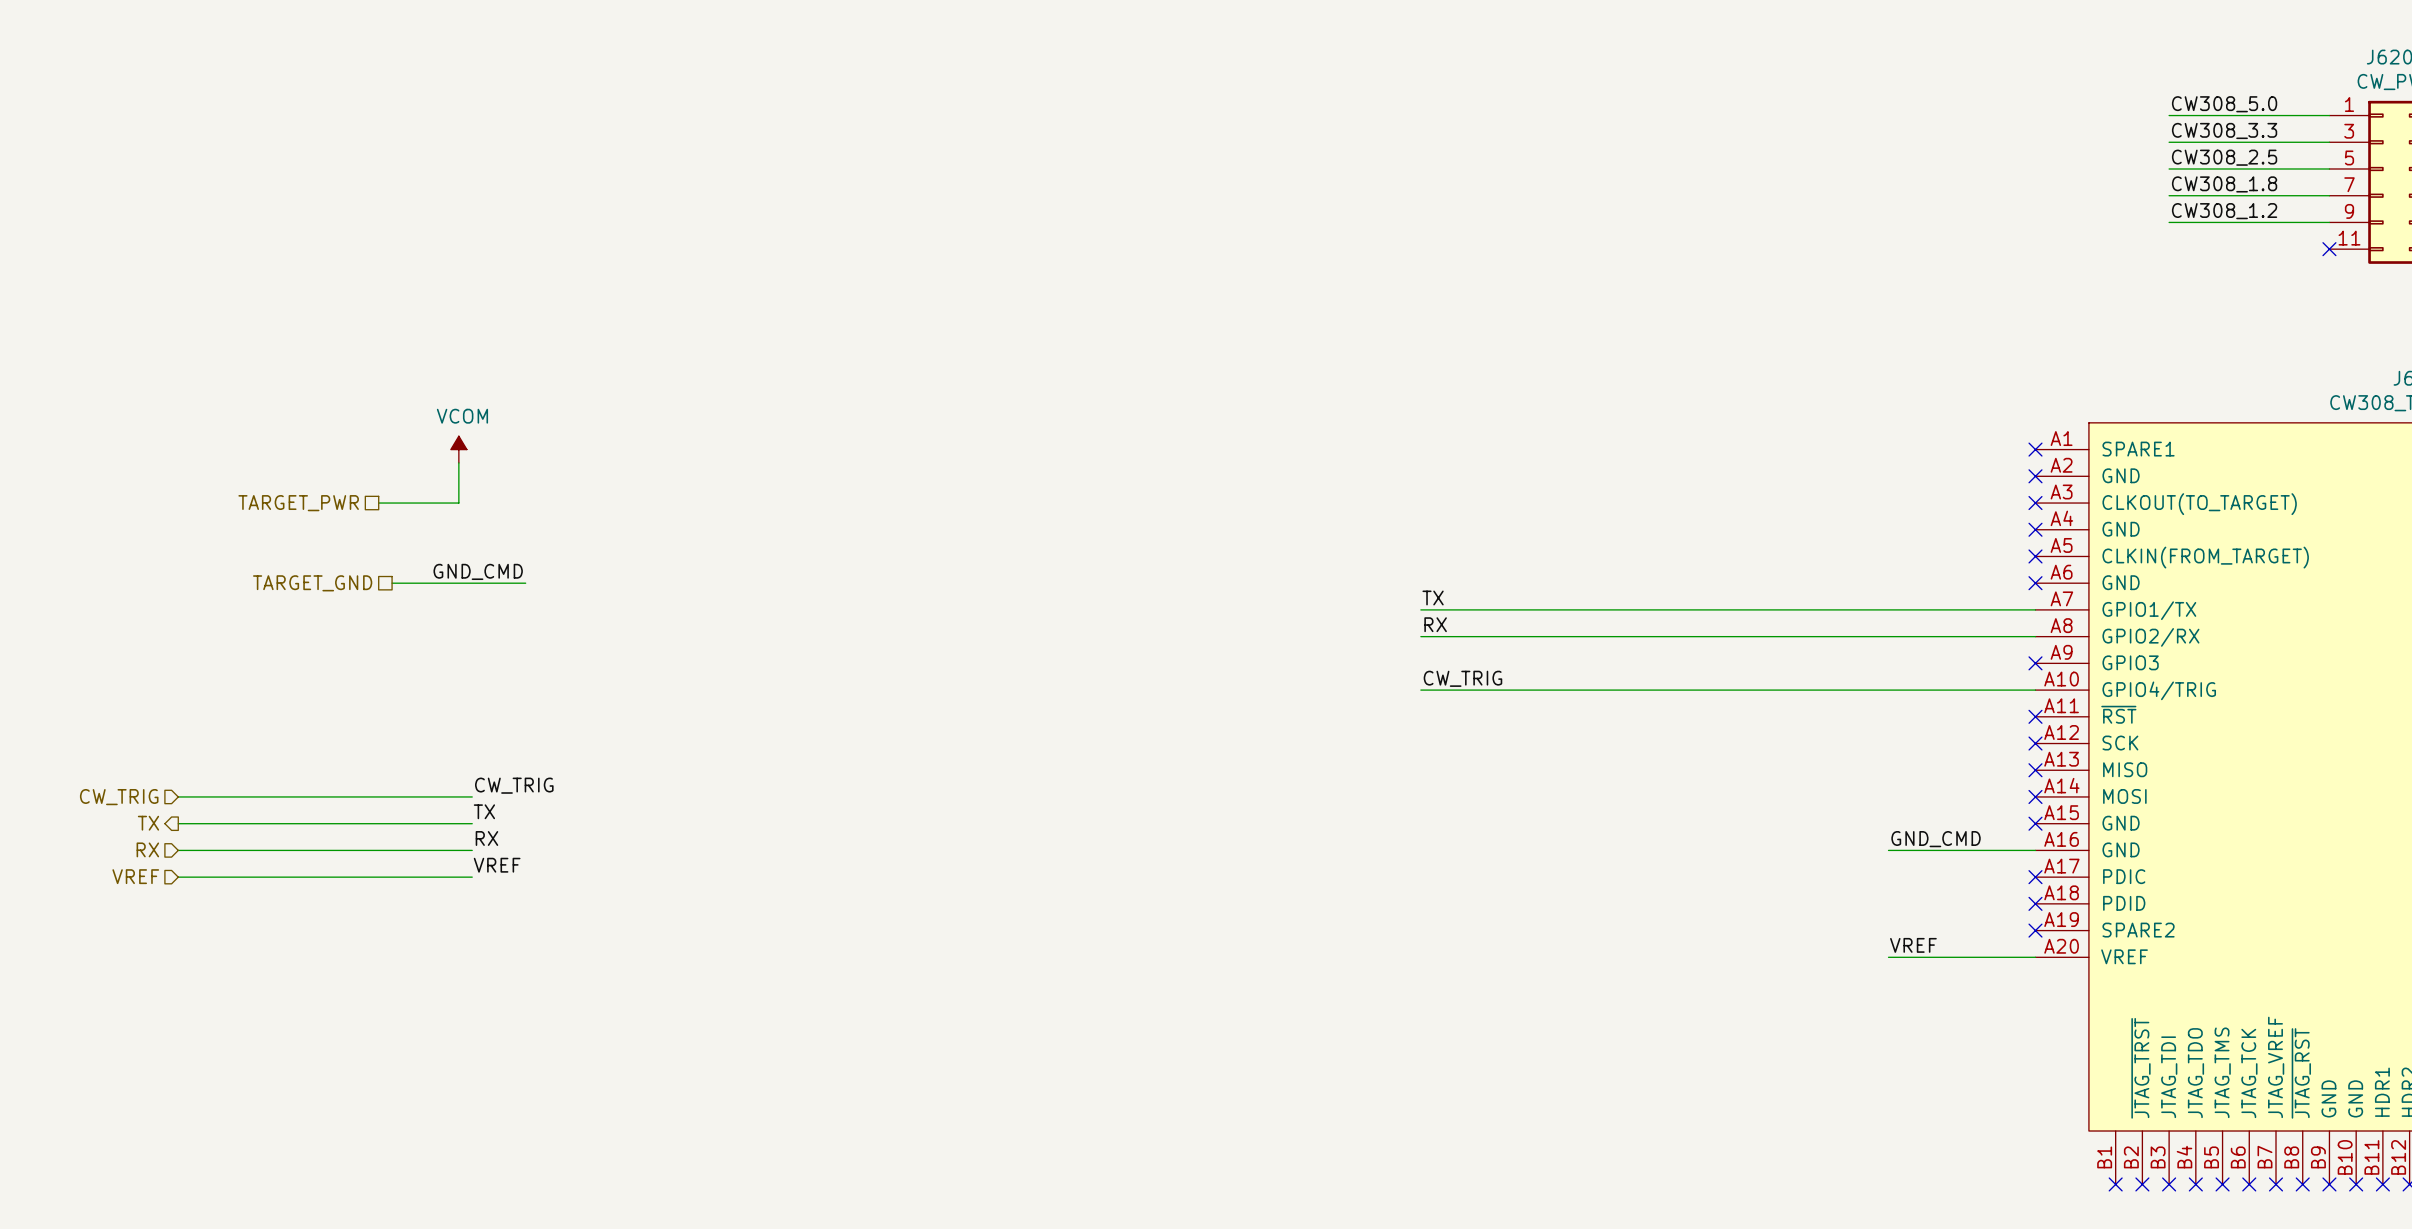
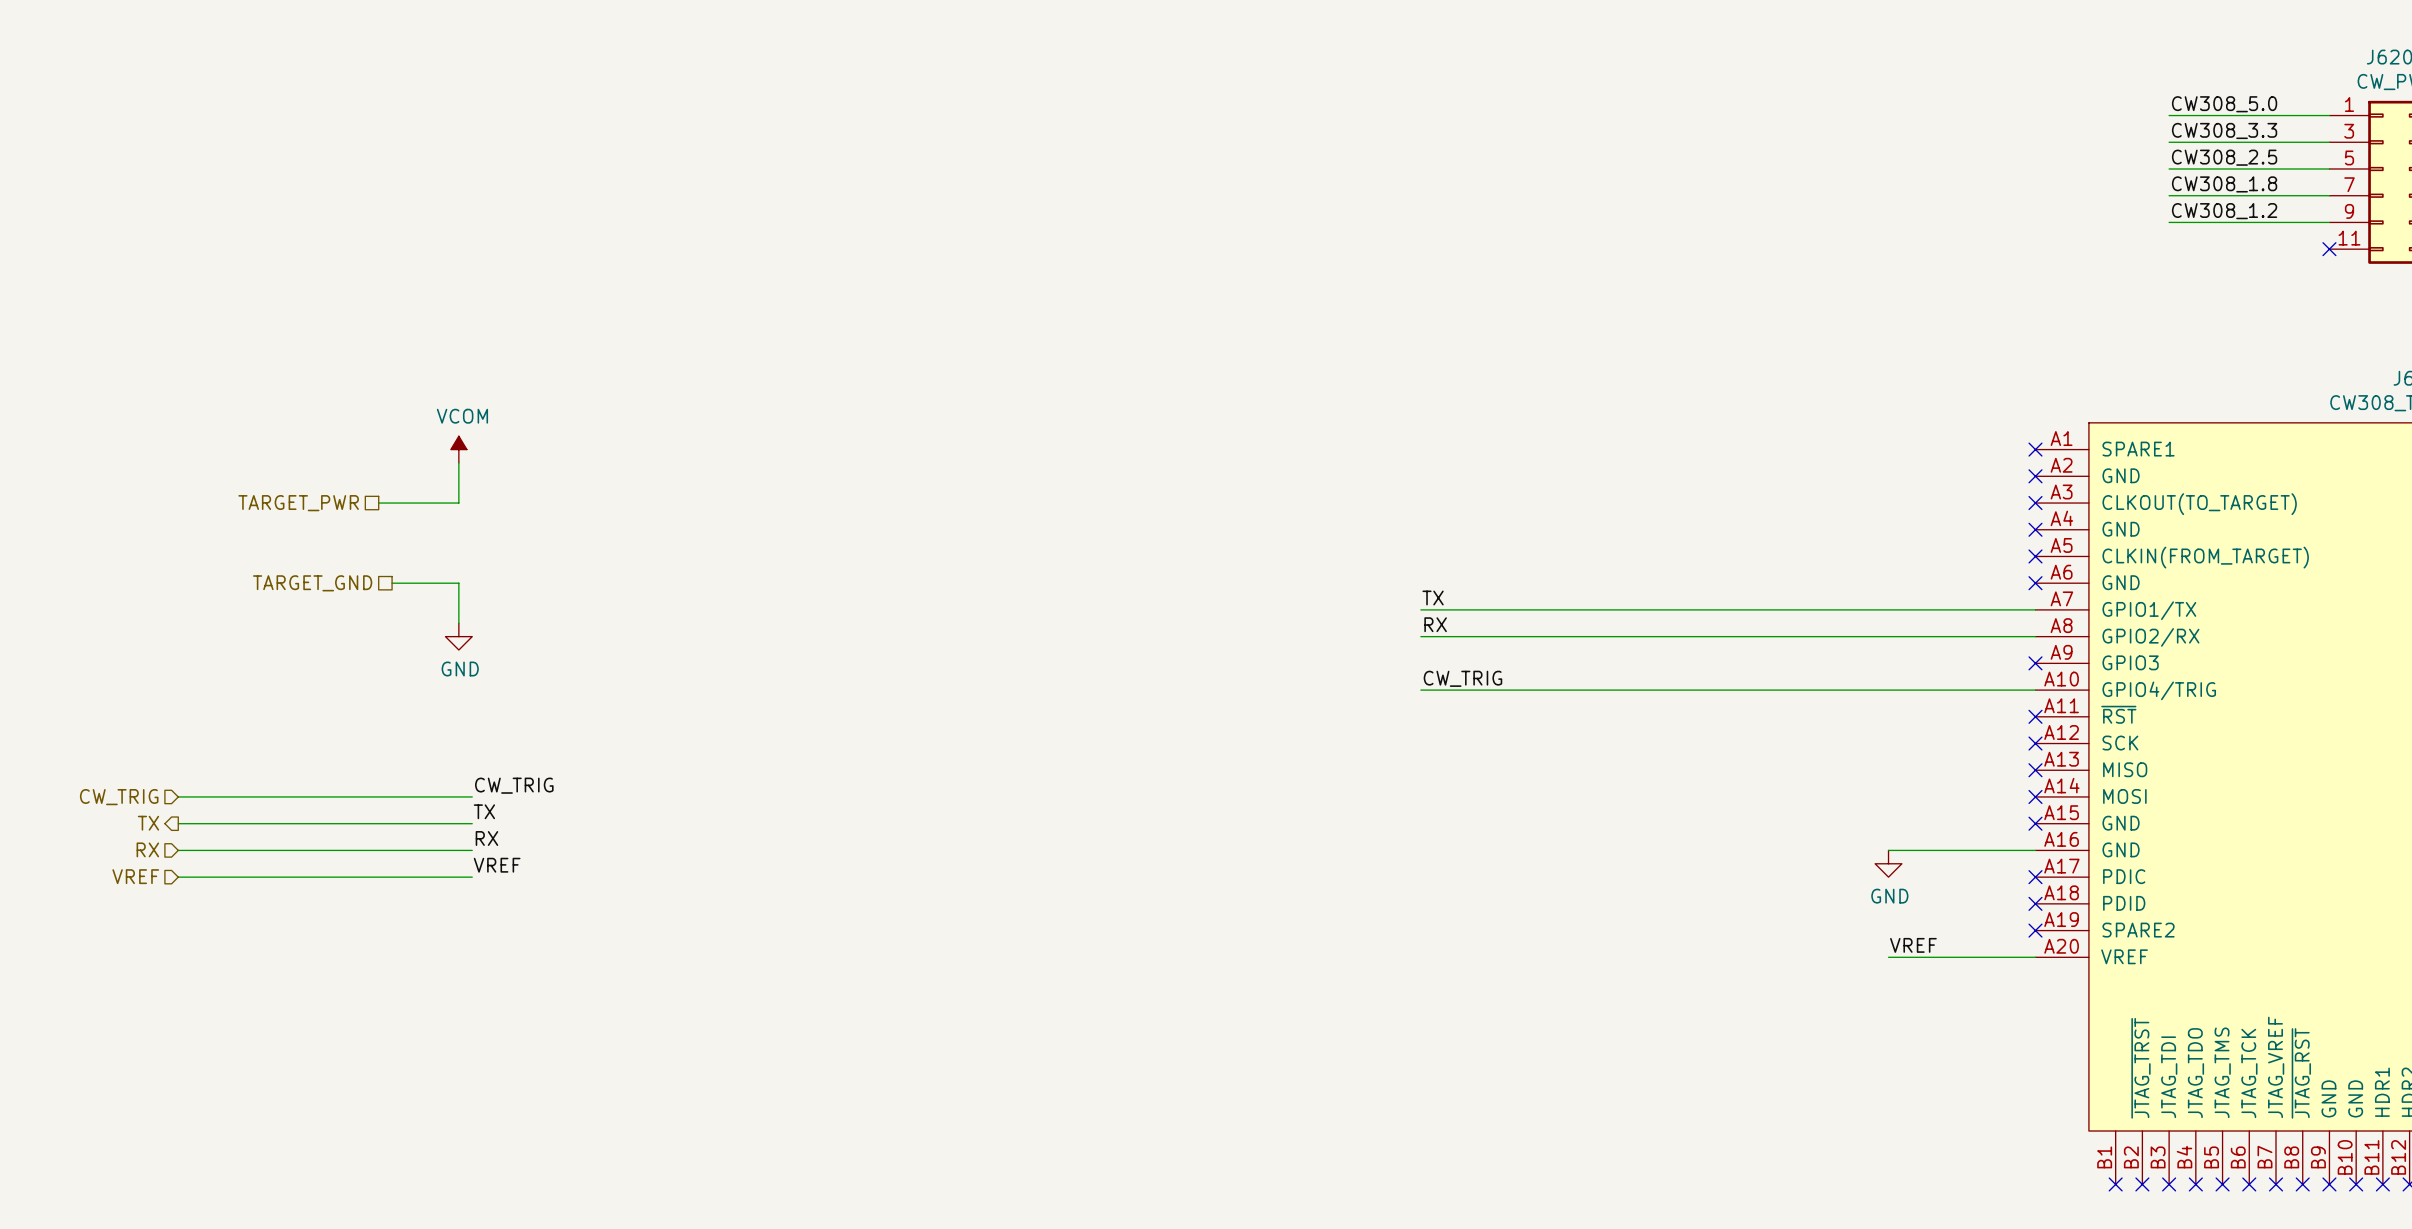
label: GND_CMD (478, 571) -> none
wire: (458, 583) (525, 583) -> (458, 583) (458, 623)
power symbol: none -> GND (458, 636)
label: GND_CMD (1936, 839) -> none
power symbol: none -> GND (1888, 863)

